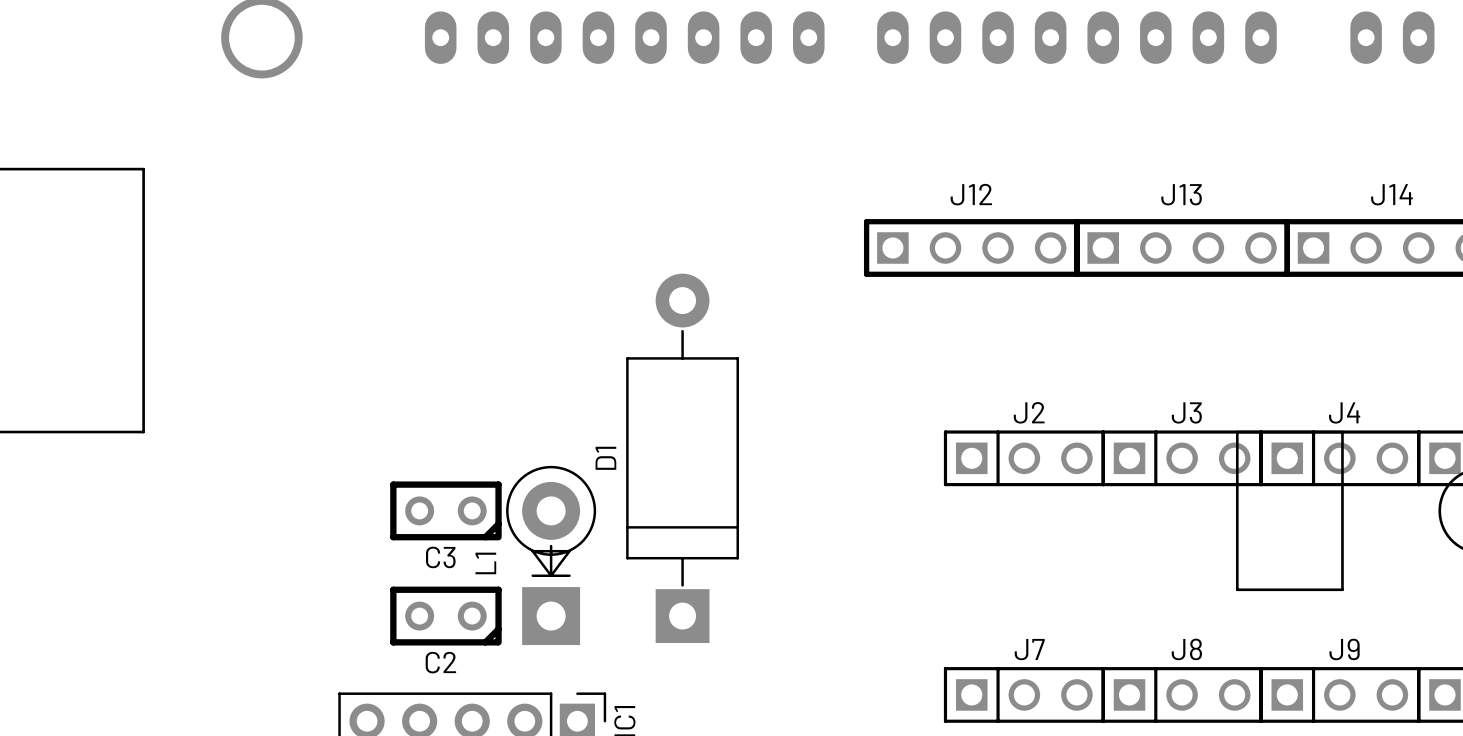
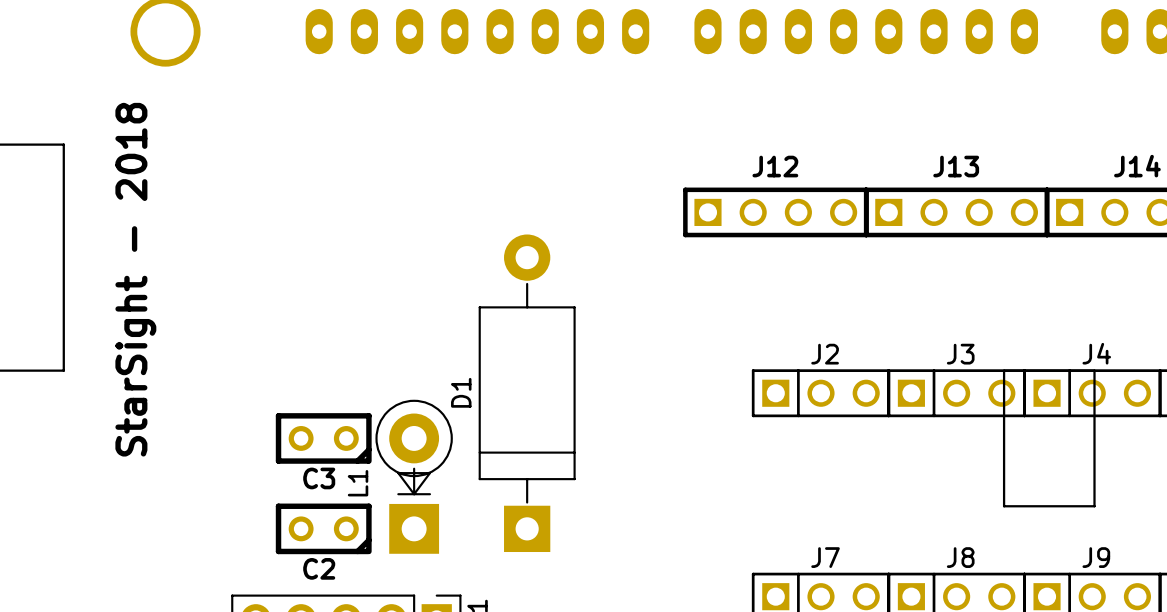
text: none -> StarSight - 2018 (135, 279)

